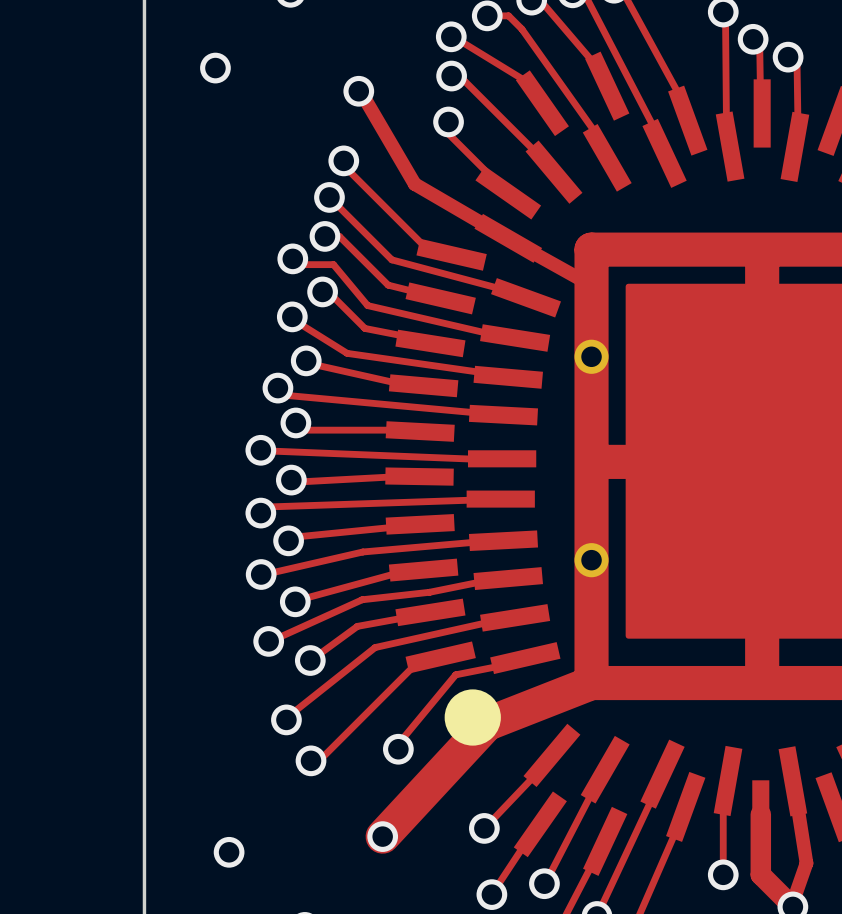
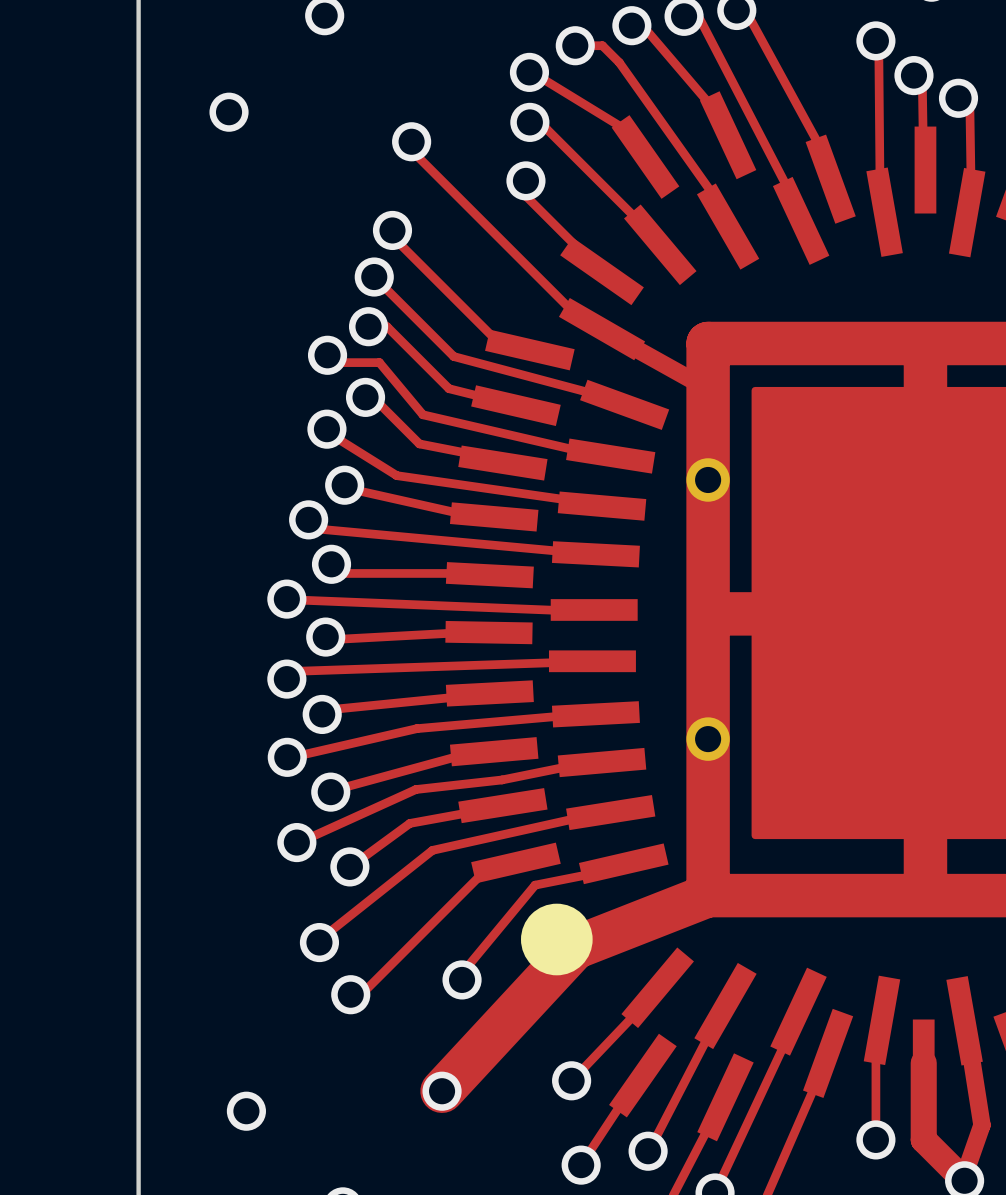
track: (362, 95) (414, 184) (488, 227) -> none
track: none -> (411, 150) (590, 329)

